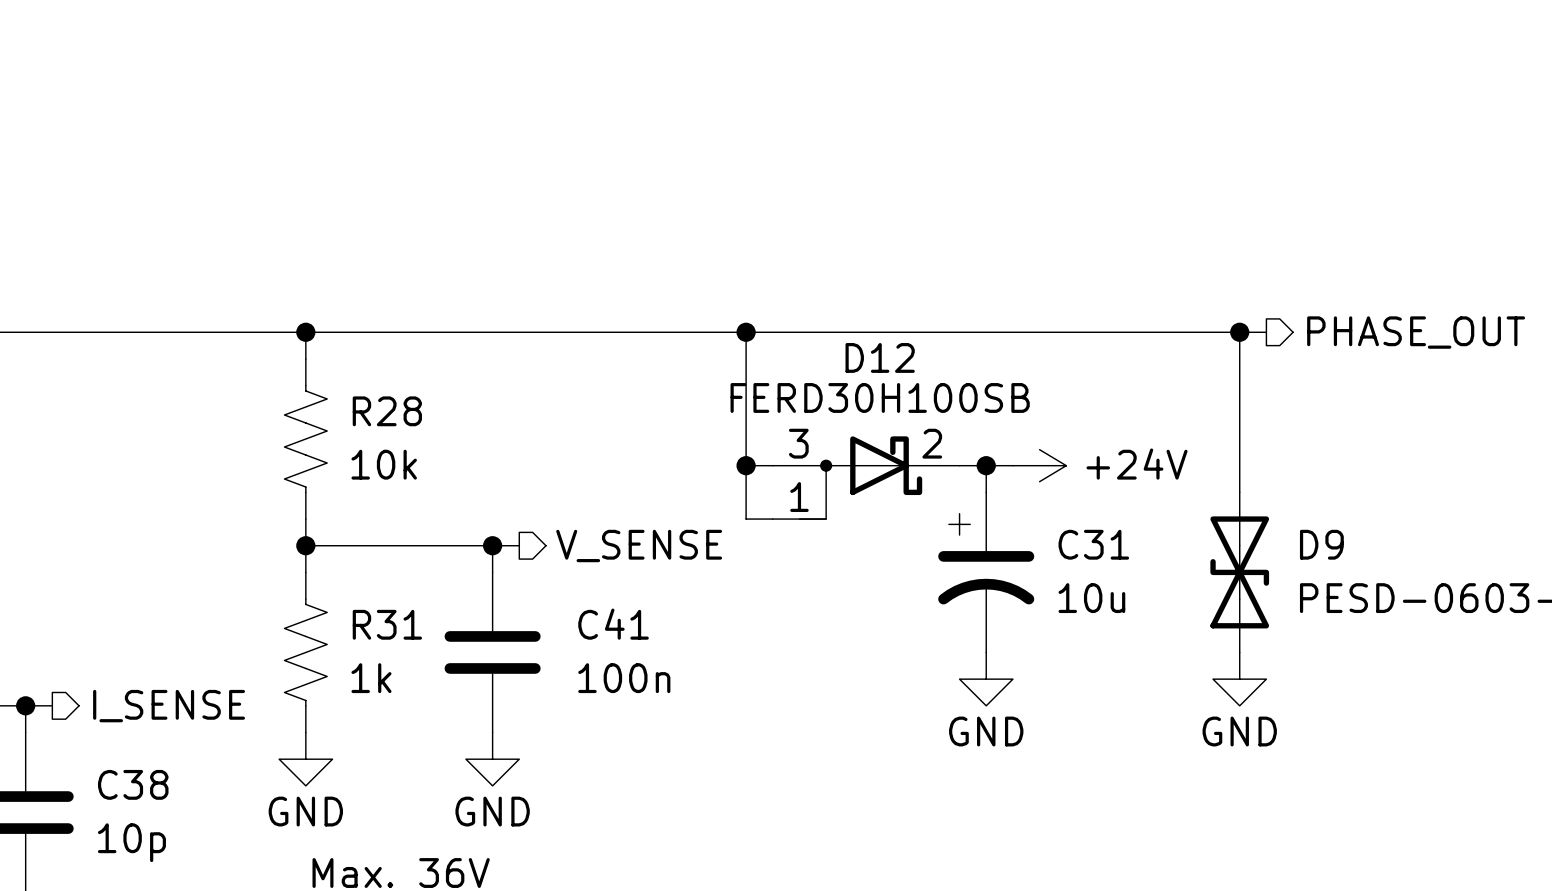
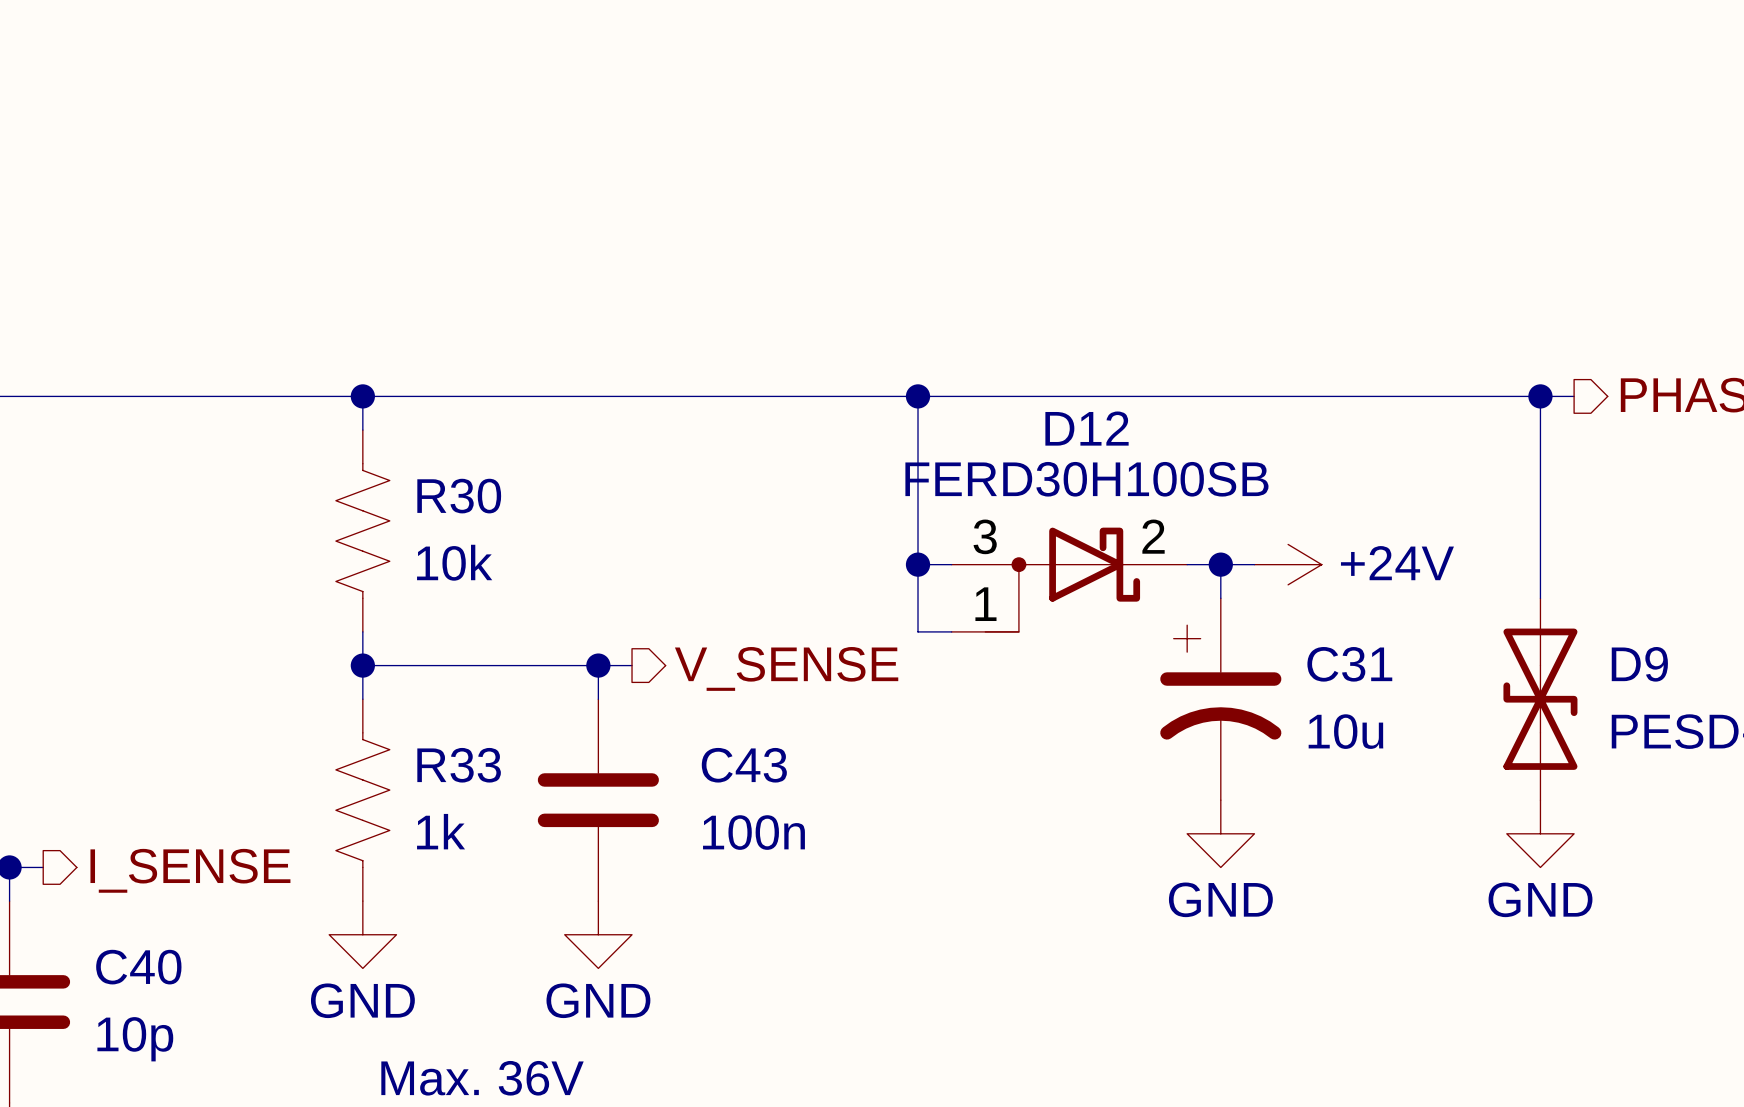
R28 name: R28 (387, 411) -> R30 (459, 496)
R31 name: R31 (387, 624) -> R33 (459, 765)
C41 name: C41 (613, 624) -> C43 (744, 765)
C38 name: C38 (133, 784) -> C40 (138, 967)

